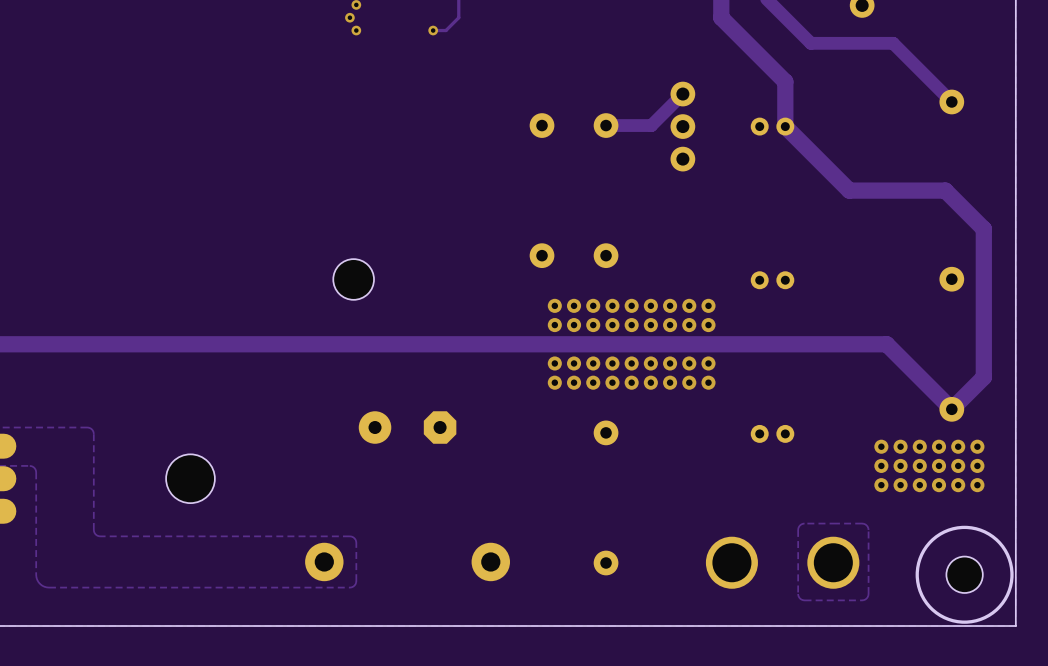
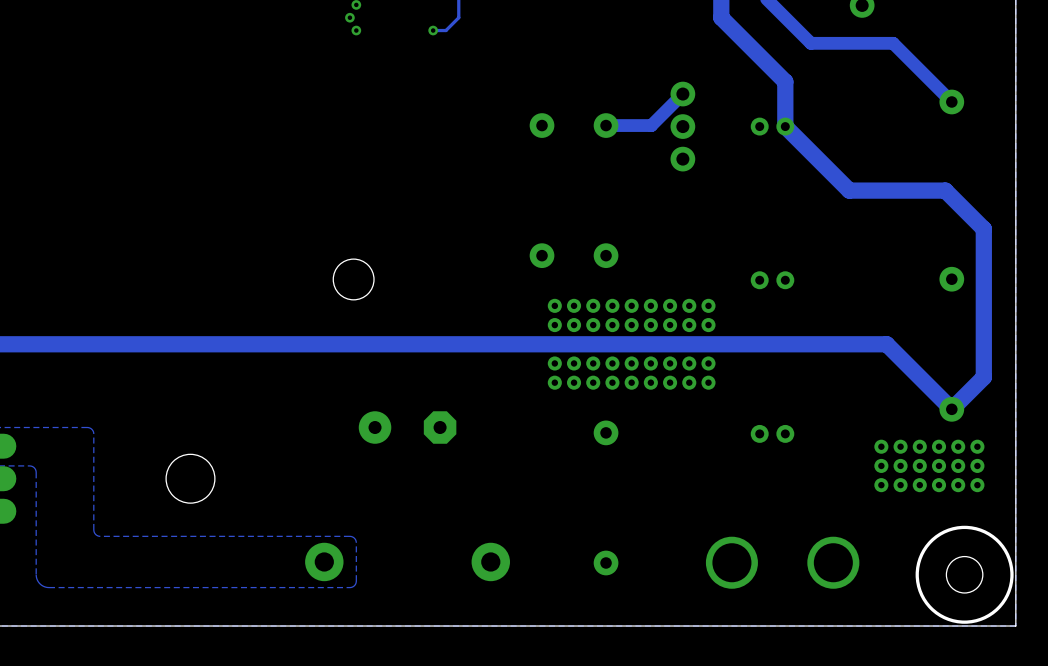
zone outline: (863, 523) (867, 526) (868, 529) (867, 597) (862, 600) (800, 599) (798, 593) (799, 526) (804, 523) (863, 523) -> none

